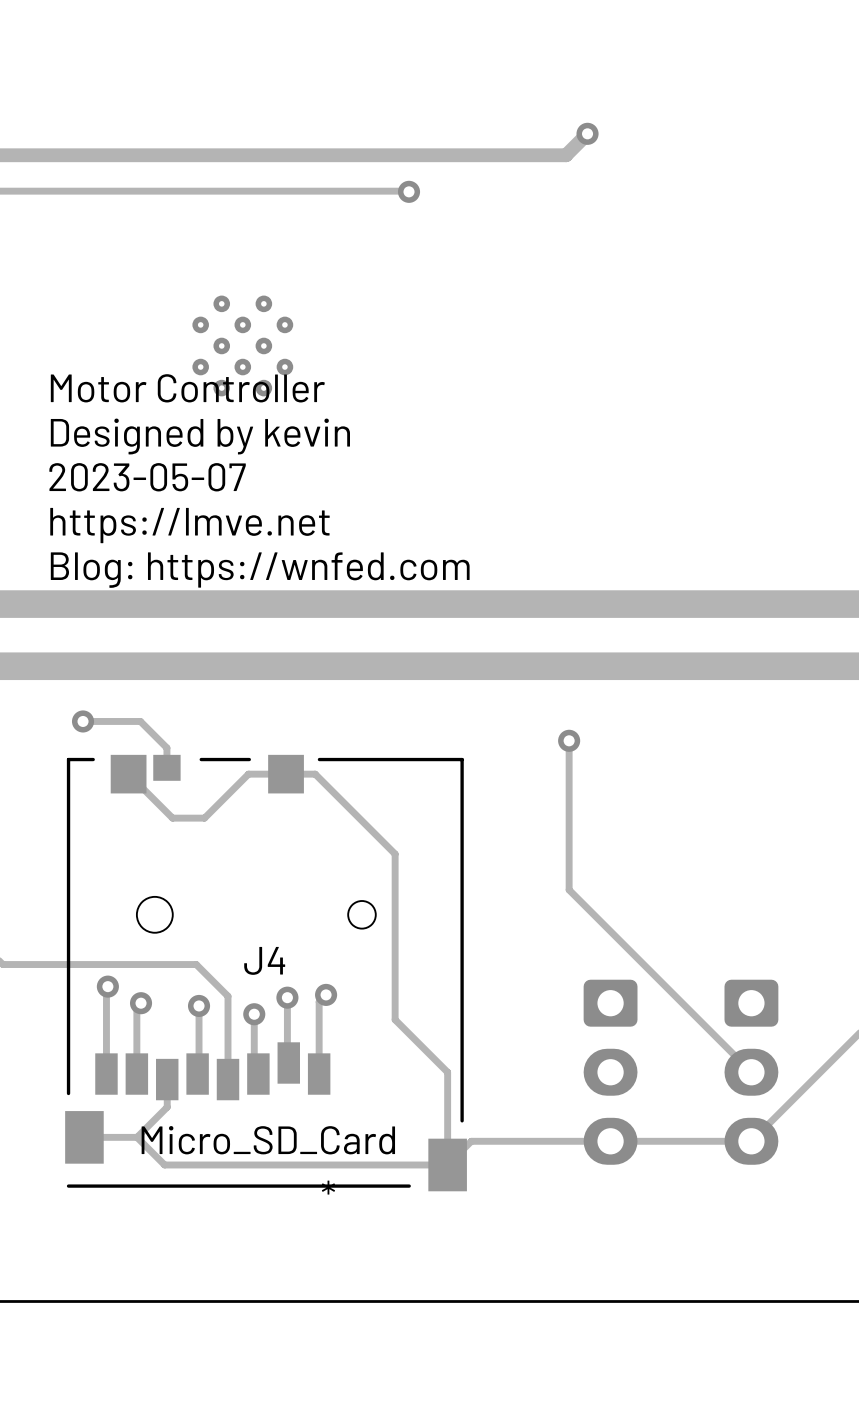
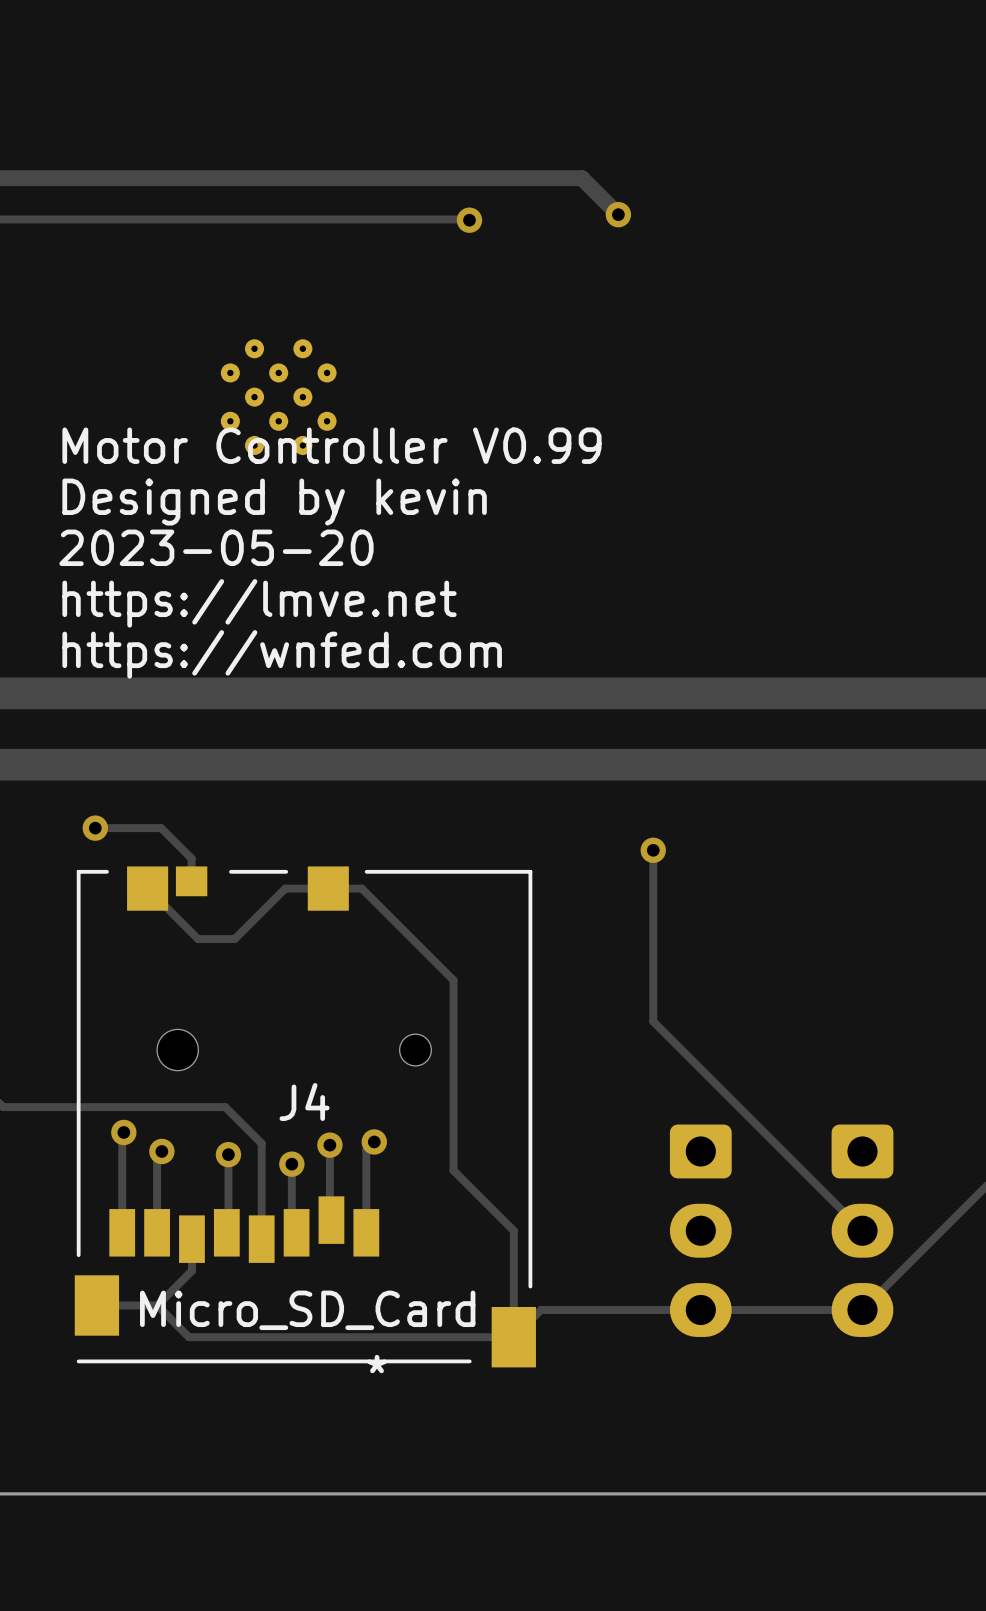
track: (587, 133) (566, 155) (506, 155) -> (618, 214) (581, 178)
via position: (587, 133) -> (618, 214)
text: Motor Controller (187, 388) -> Motor Controller V0.99 (331, 445)
text: 2023-05-07 (147, 477) -> 2023-05-20 (216, 547)
text: Blog: https://wnfed.com (260, 570) -> https://wnfed.com (282, 654)

